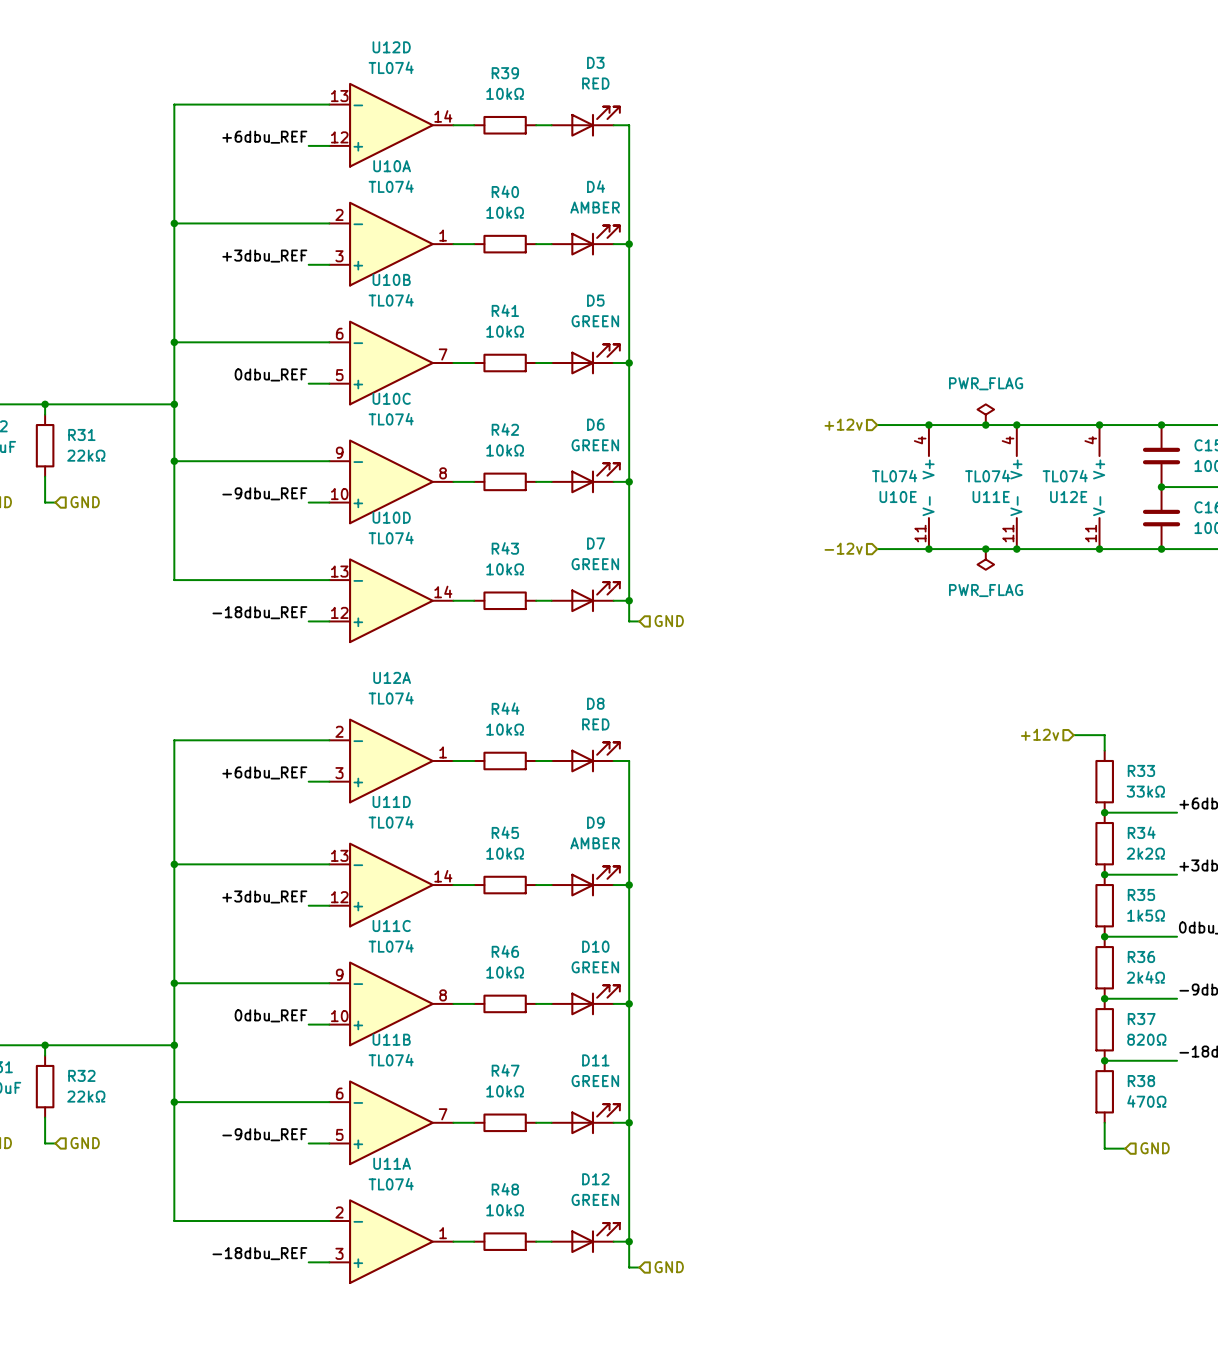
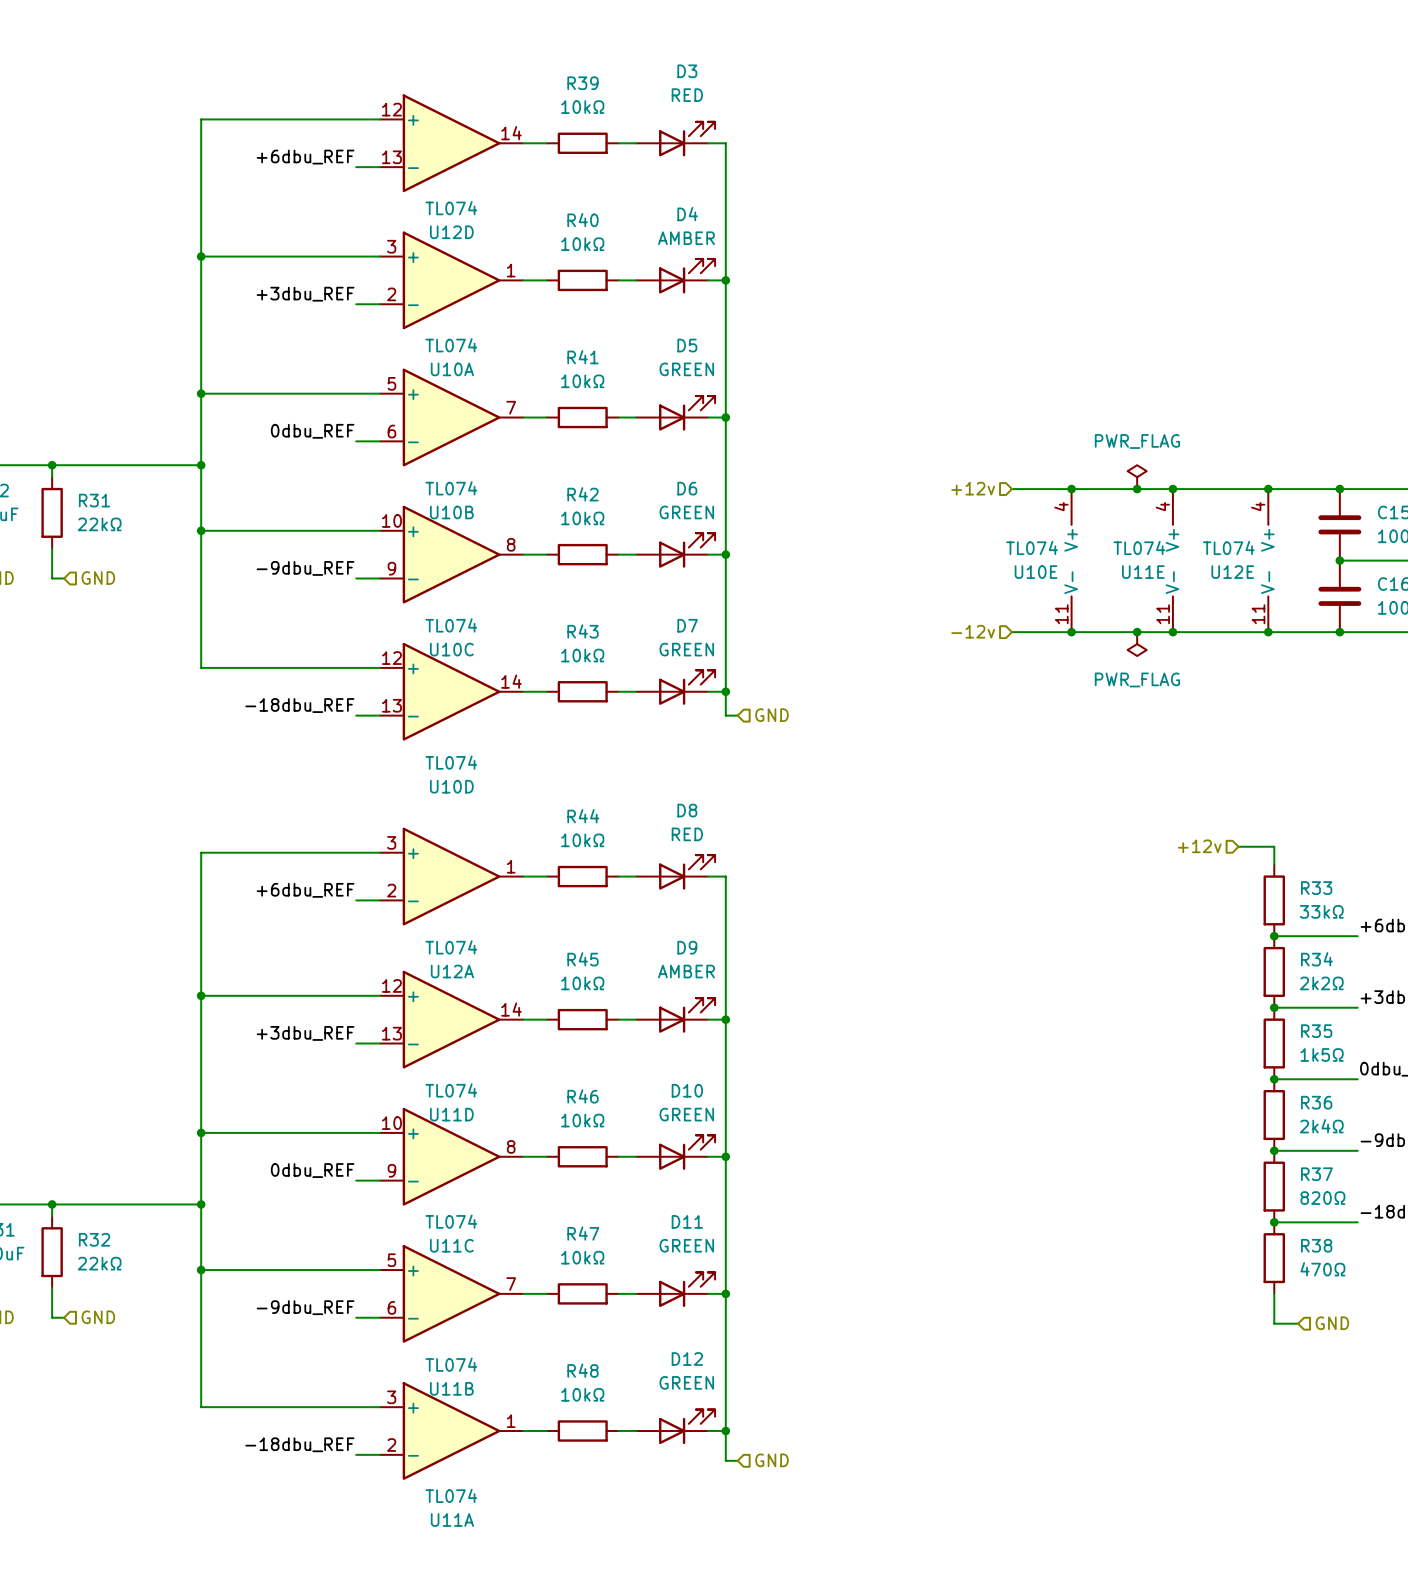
U12D flip: as is (391, 125) -> up-down (451, 143)
U10A flip: as is (391, 244) -> up-down (451, 280)
U10B flip: as is (391, 363) -> up-down (451, 417)
U10C flip: as is (391, 481) -> up-down (451, 554)
U10D flip: as is (391, 600) -> up-down (451, 691)
U12A flip: as is (391, 760) -> up-down (451, 876)
U11D flip: as is (391, 885) -> up-down (451, 1019)
U11C flip: as is (391, 1003) -> up-down (451, 1156)
U11B flip: as is (391, 1122) -> up-down (451, 1293)
U11A flip: as is (391, 1241) -> up-down (451, 1431)

